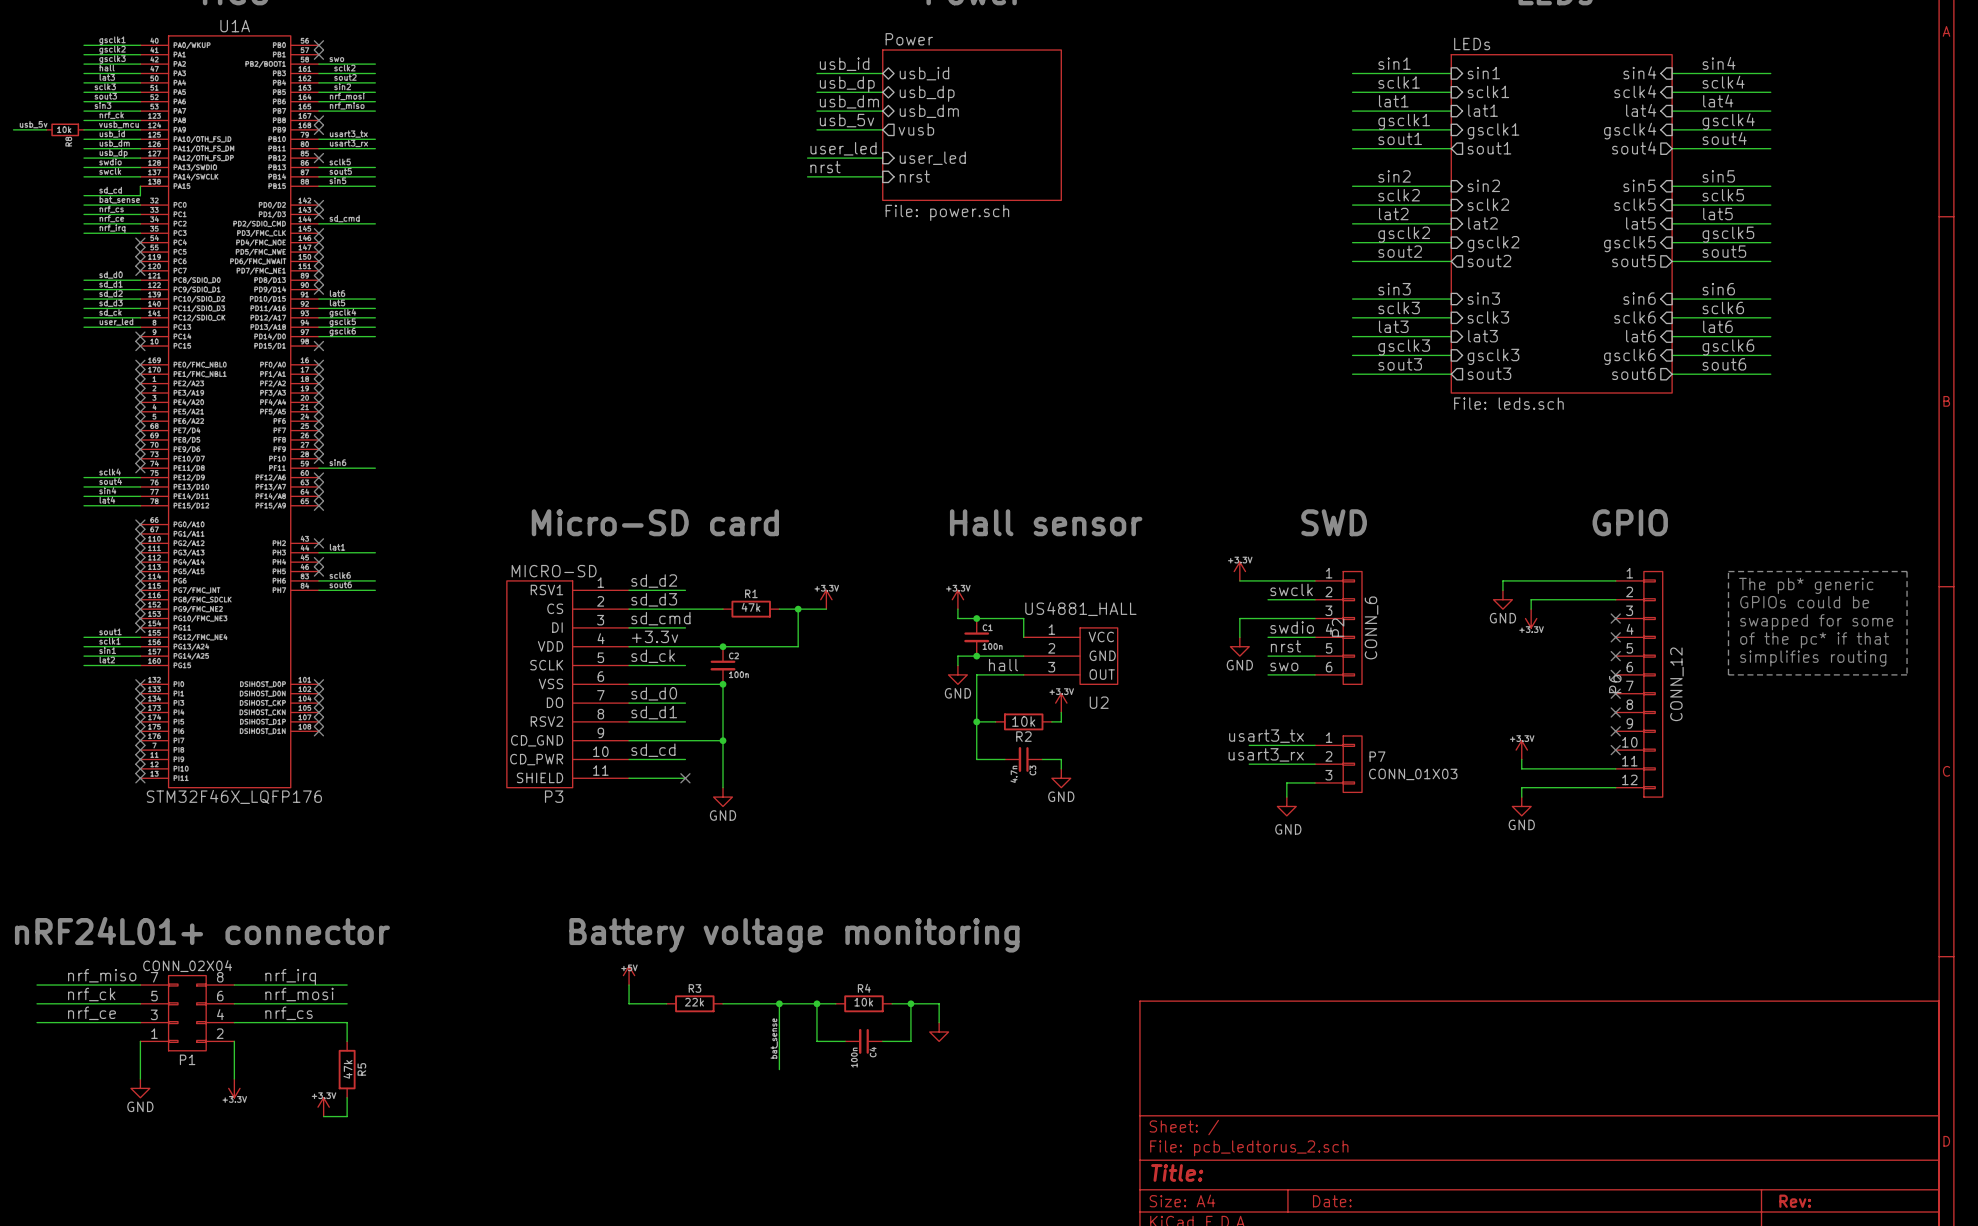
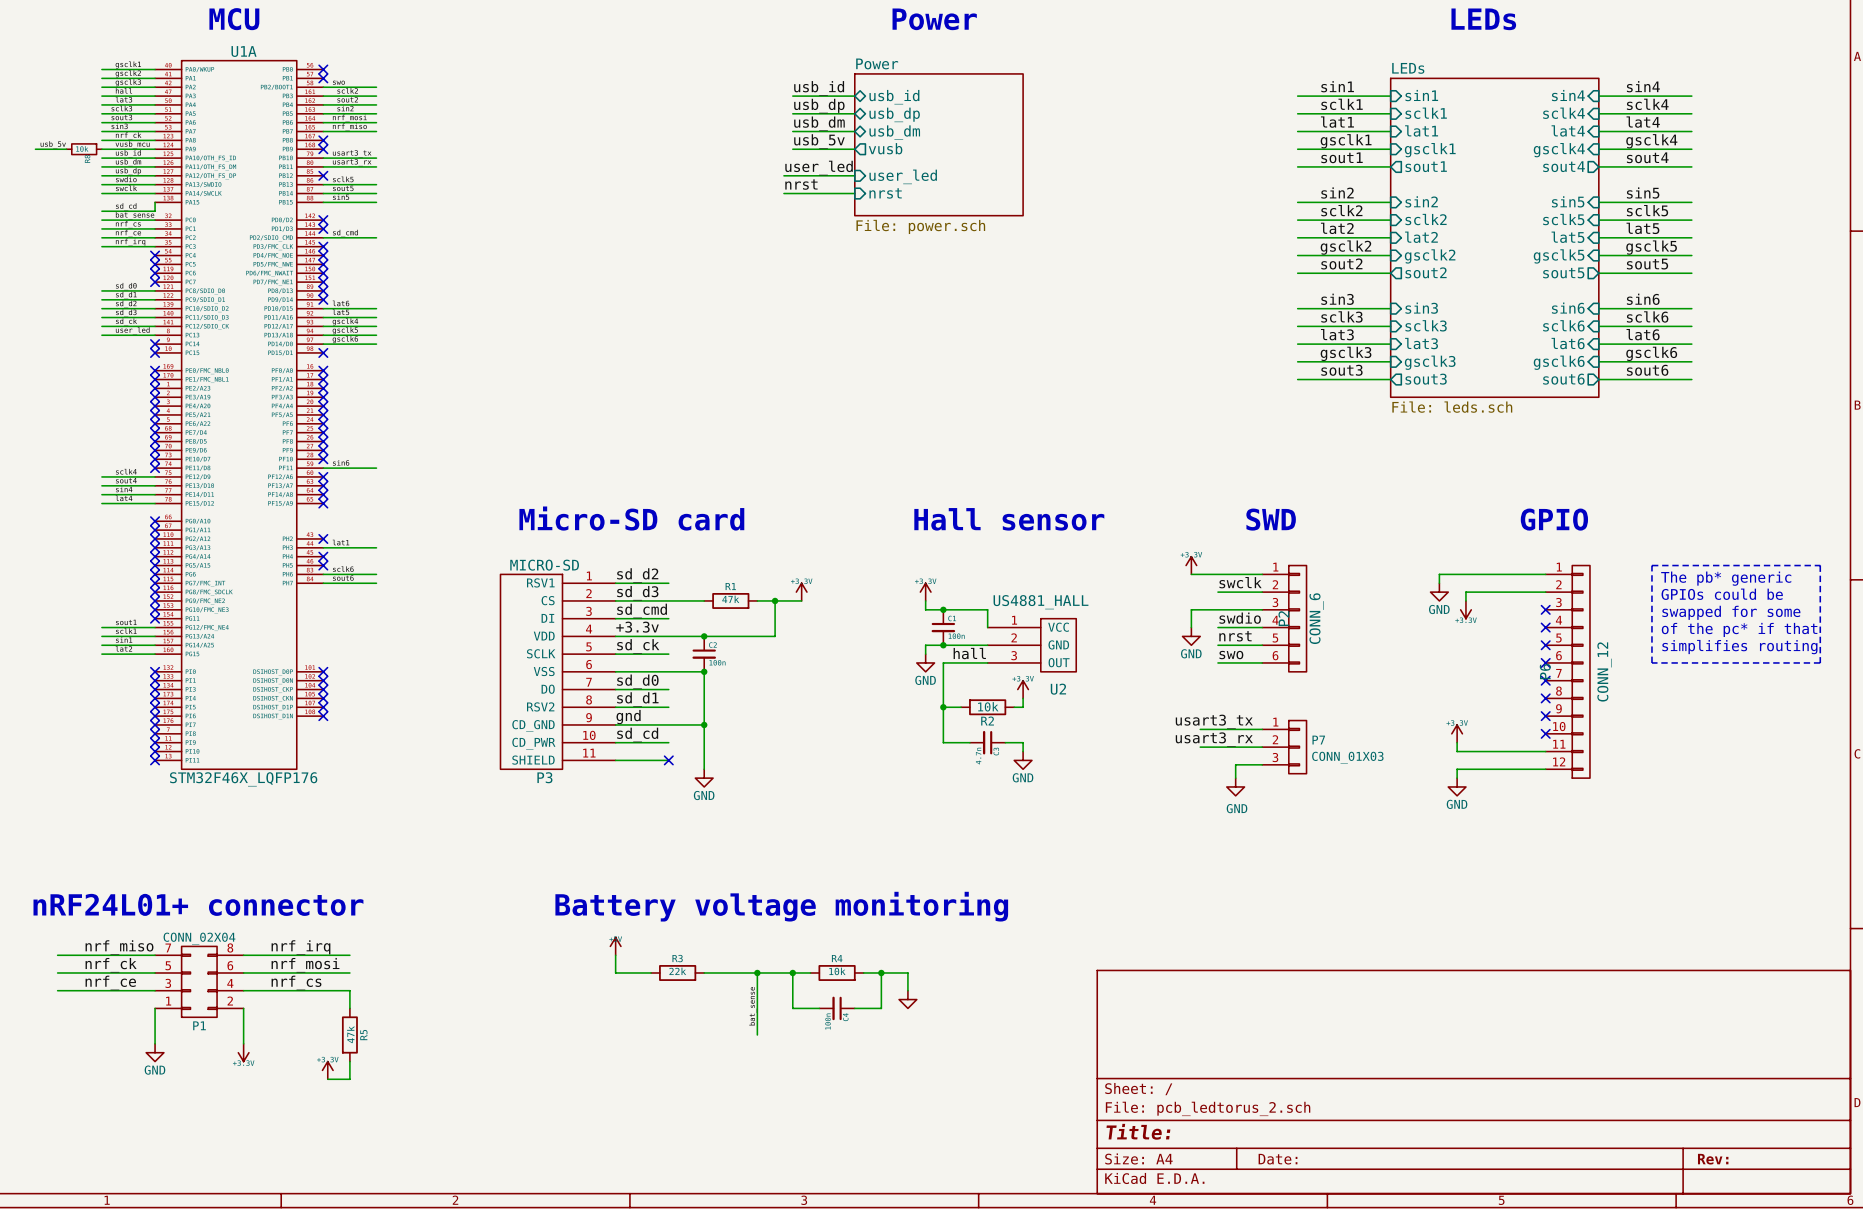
label: none -> gnd (628, 717)

